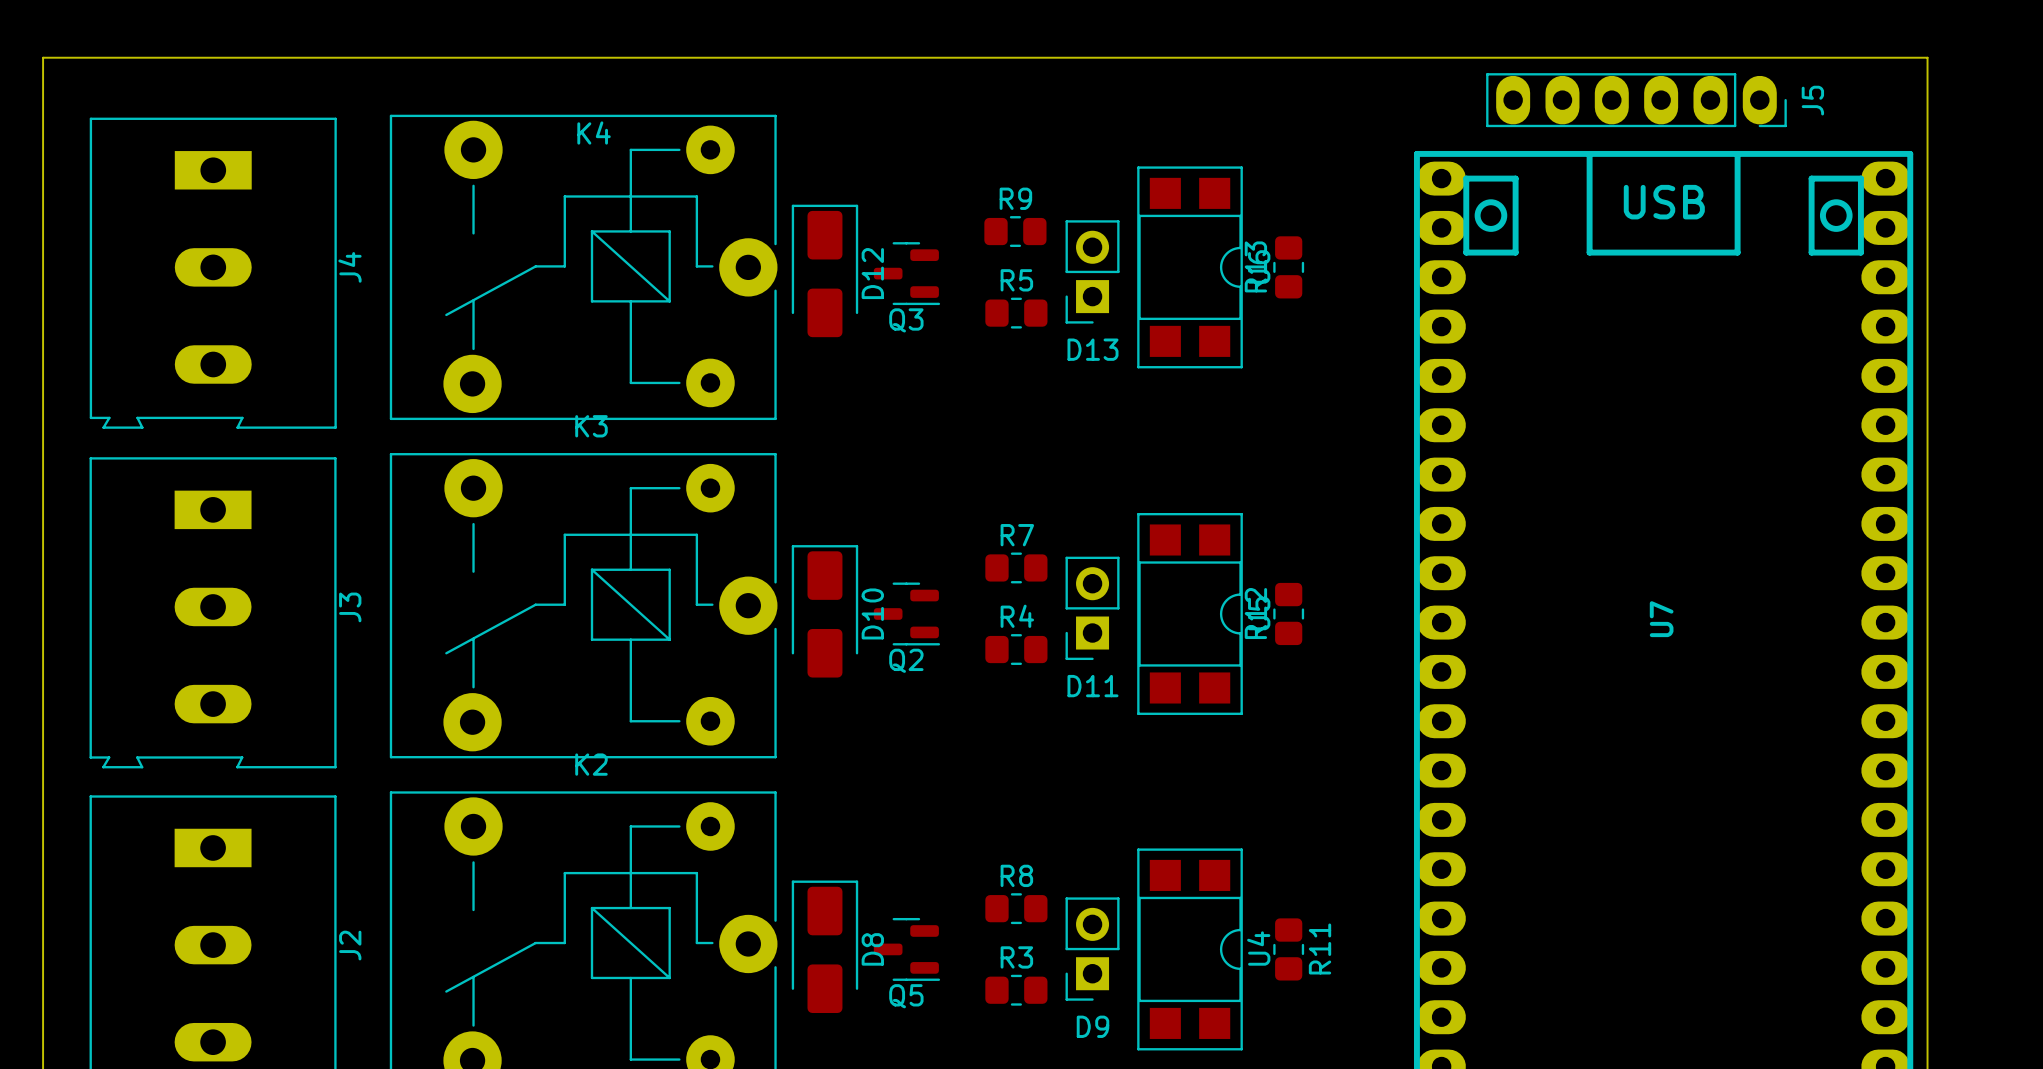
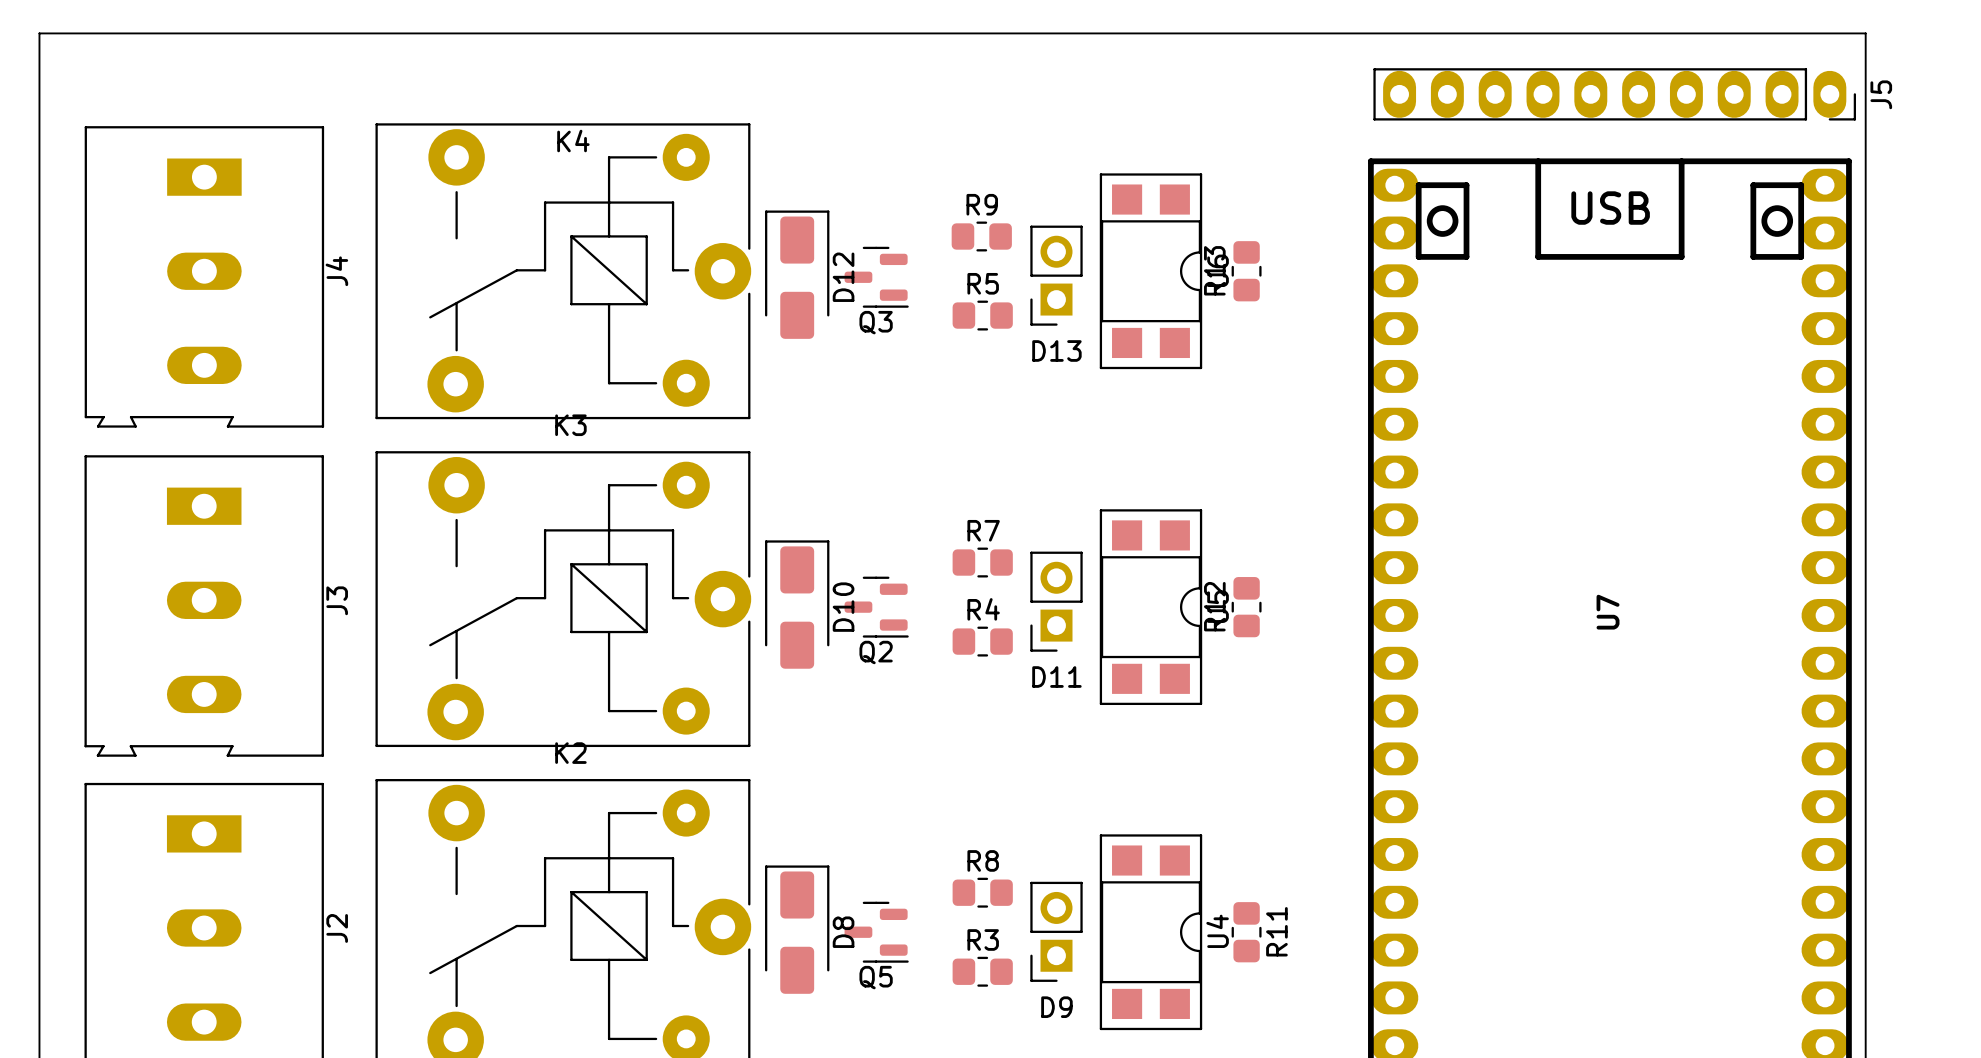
board edge: (43, 57) (1927, 57) -> (39, 68) (39, 33) (1865, 33) (1865, 68)
J5 footprint: [1486, 73, 1787, 128] -> [1373, 68, 1857, 121]
J5 name position: J5 (1812, 100) -> J5 (1881, 94)

